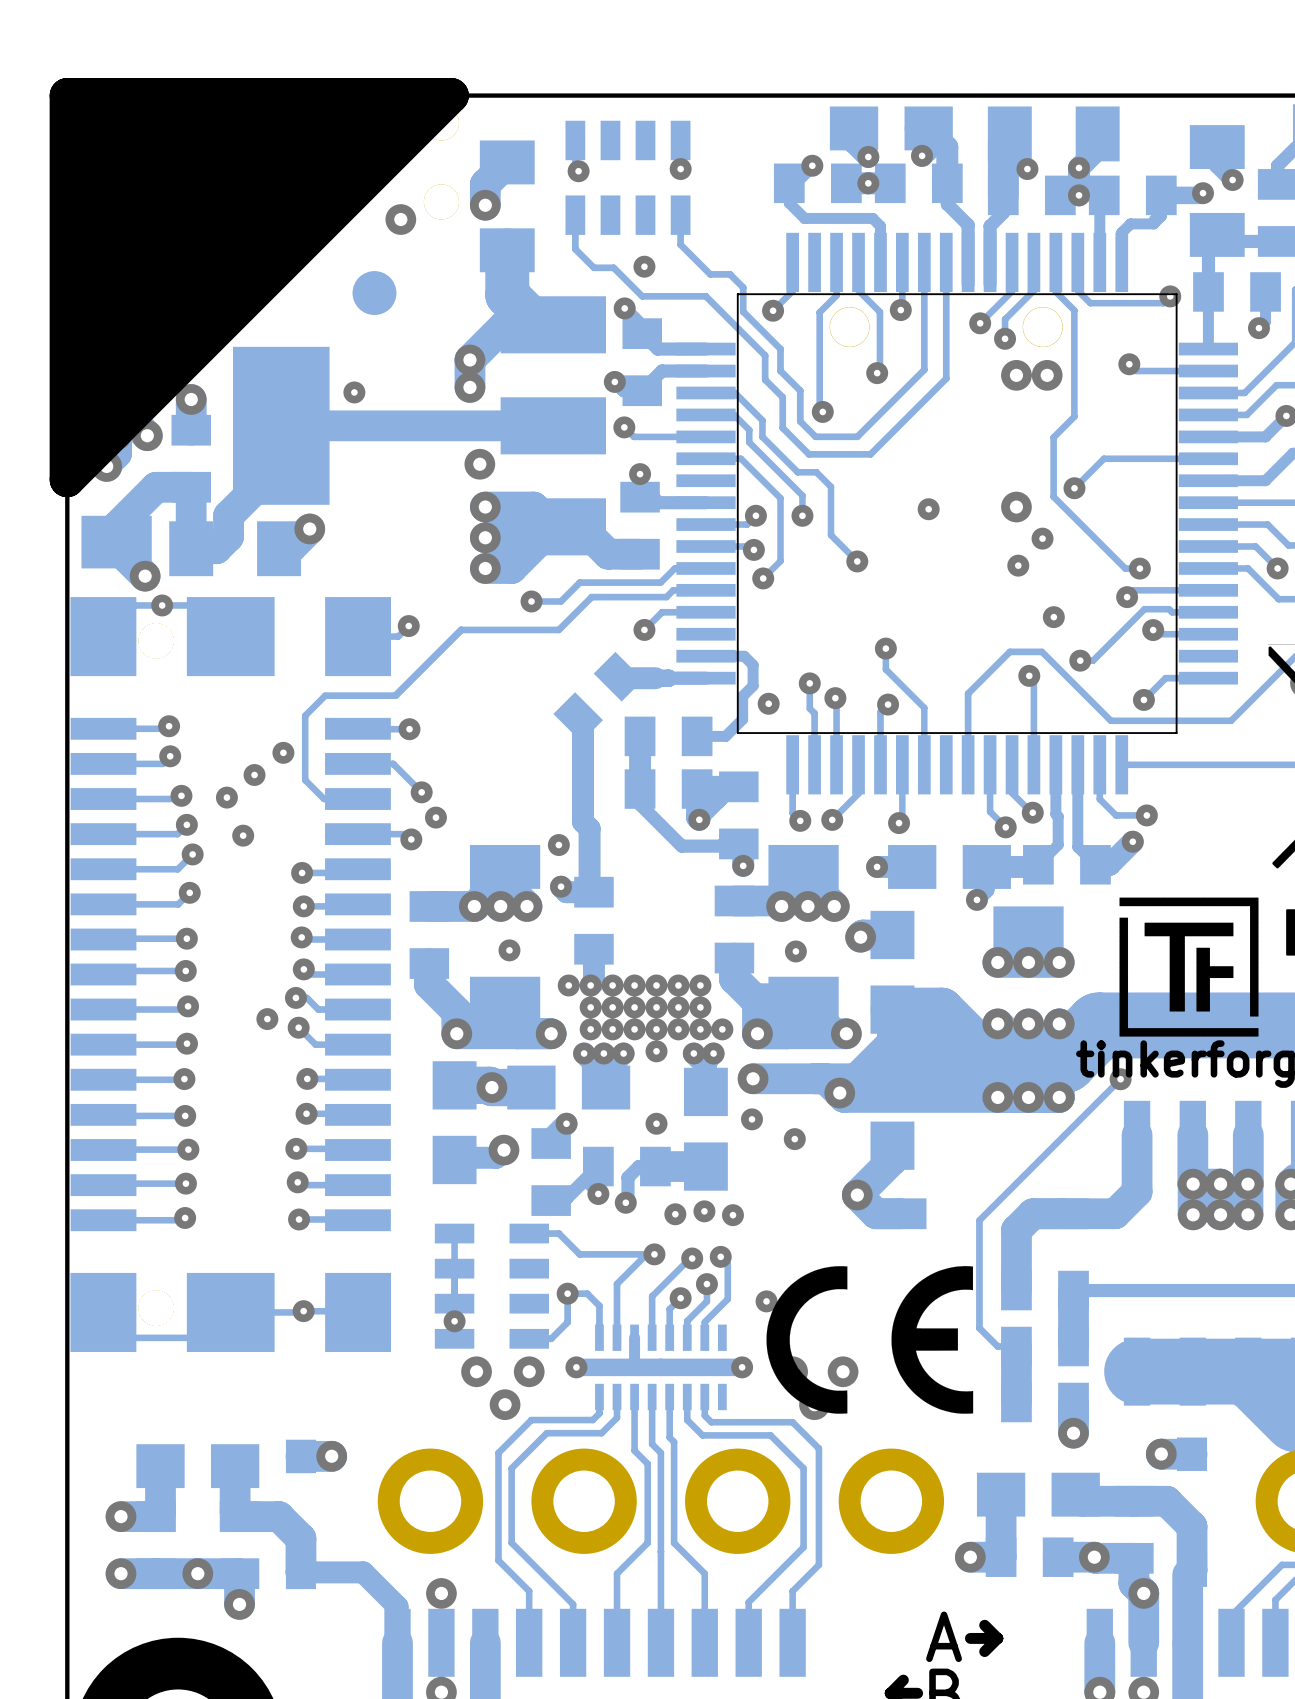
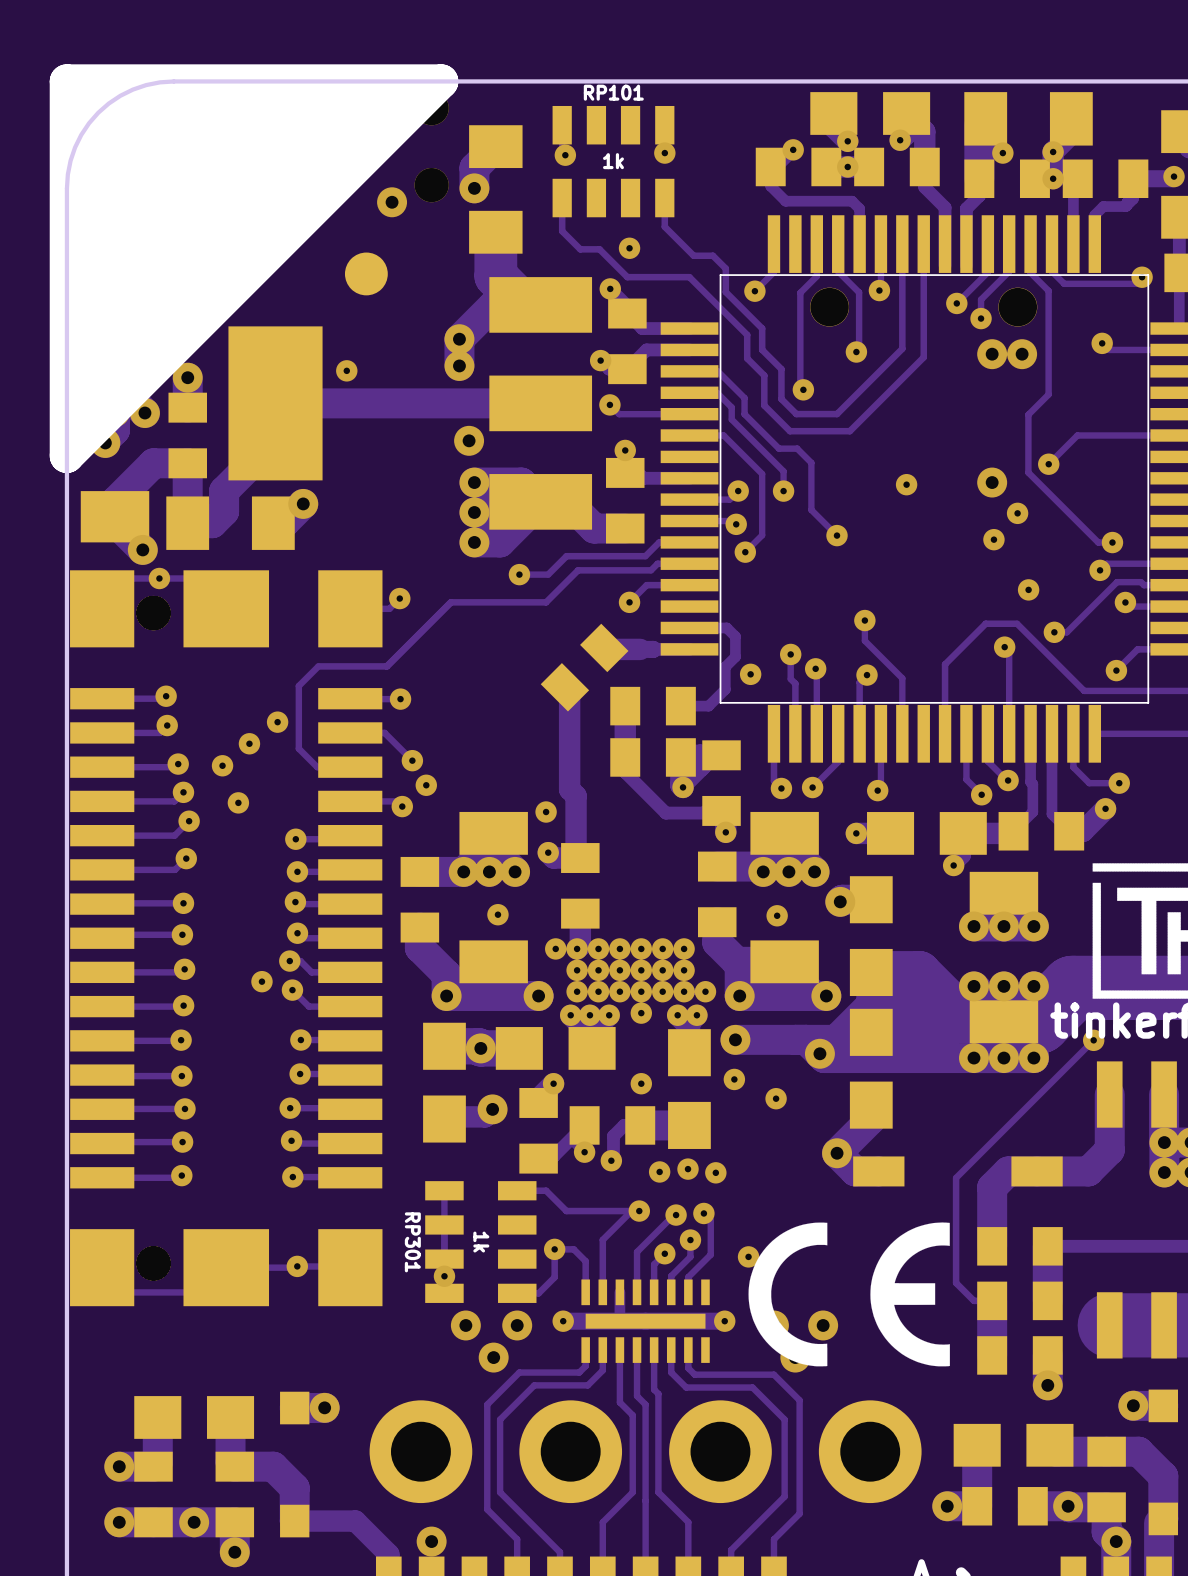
RP101 name: none -> RP101 (613, 92)
RP101 value: none -> 1k (613, 161)
RP301 name: none -> RP301 (412, 1242)
RP301 value: none -> 1k (481, 1242)

